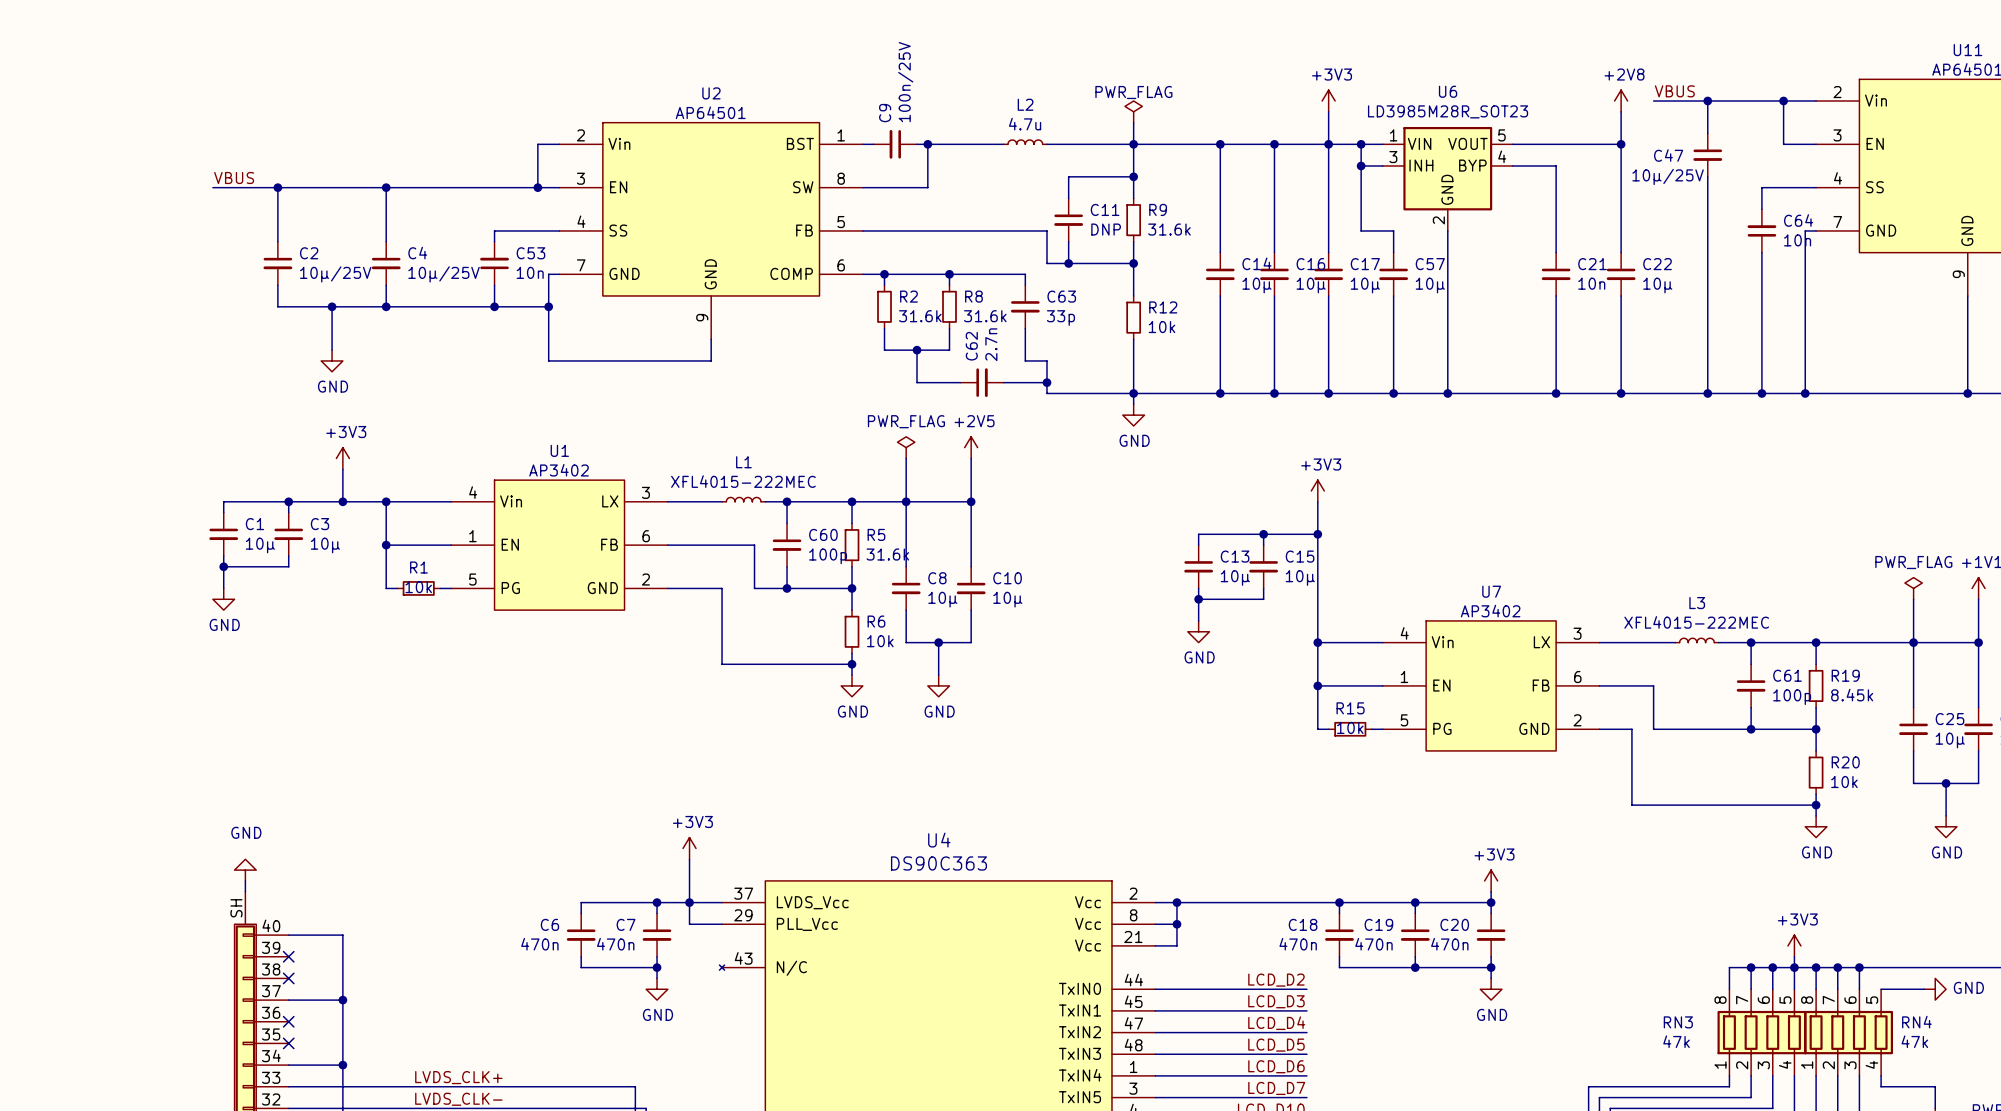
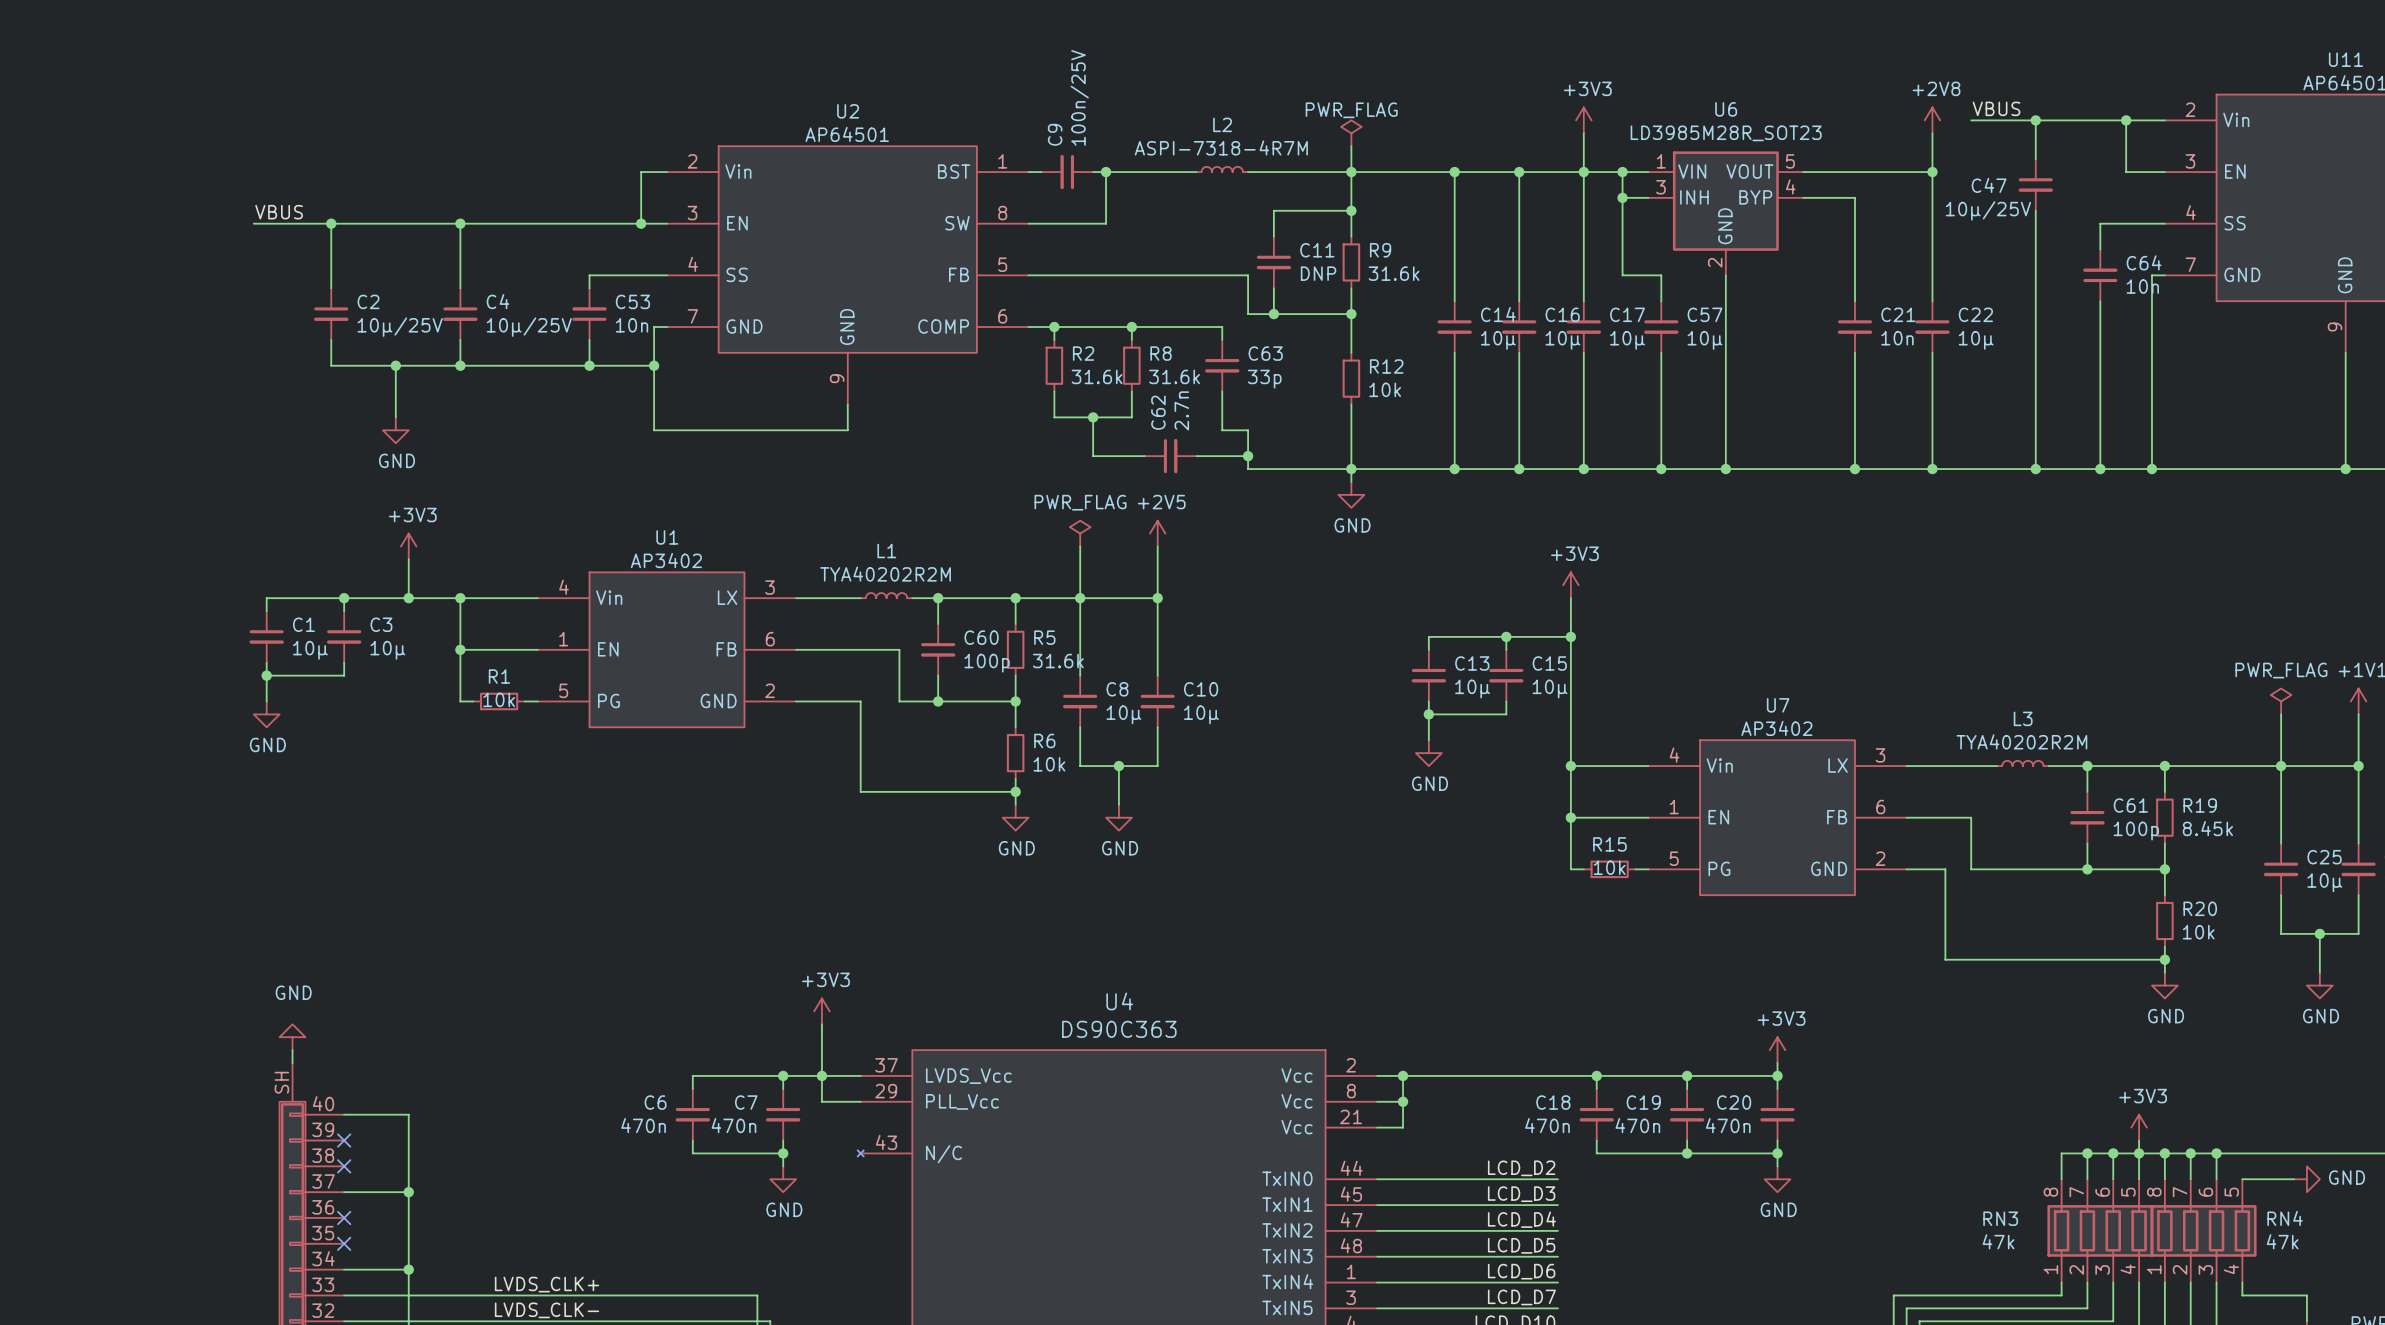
L2 value: 4.7u (1025, 124) -> ASPI-7318-4R7M (1221, 147)
L1 value: XFL4015-222MEC (743, 481) -> TYA40202R2M (885, 574)
L3 value: XFL4015-222MEC (1696, 622) -> TYA40202R2M (2021, 741)

